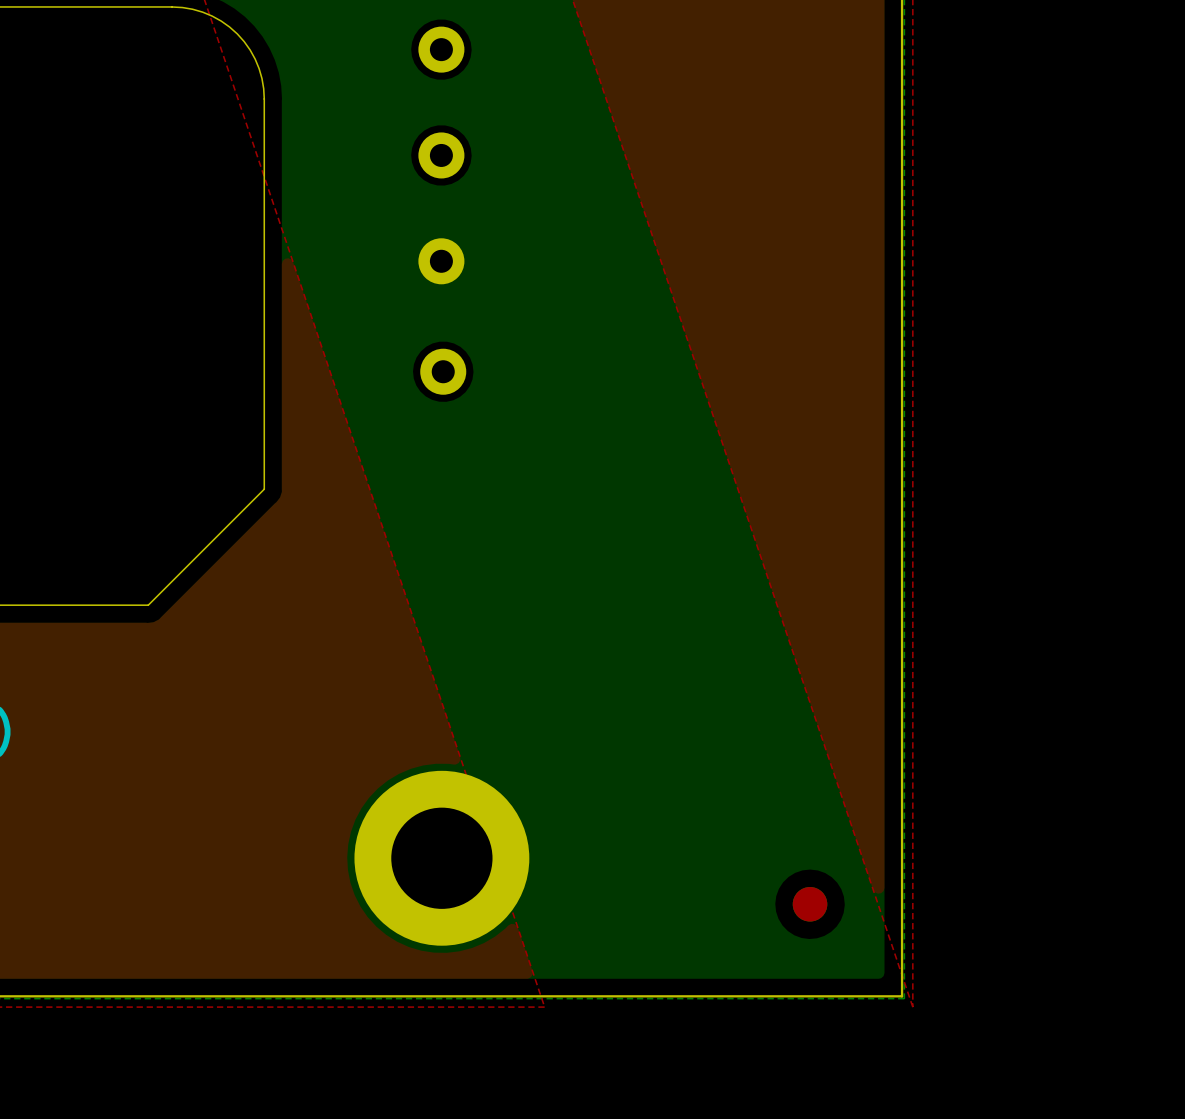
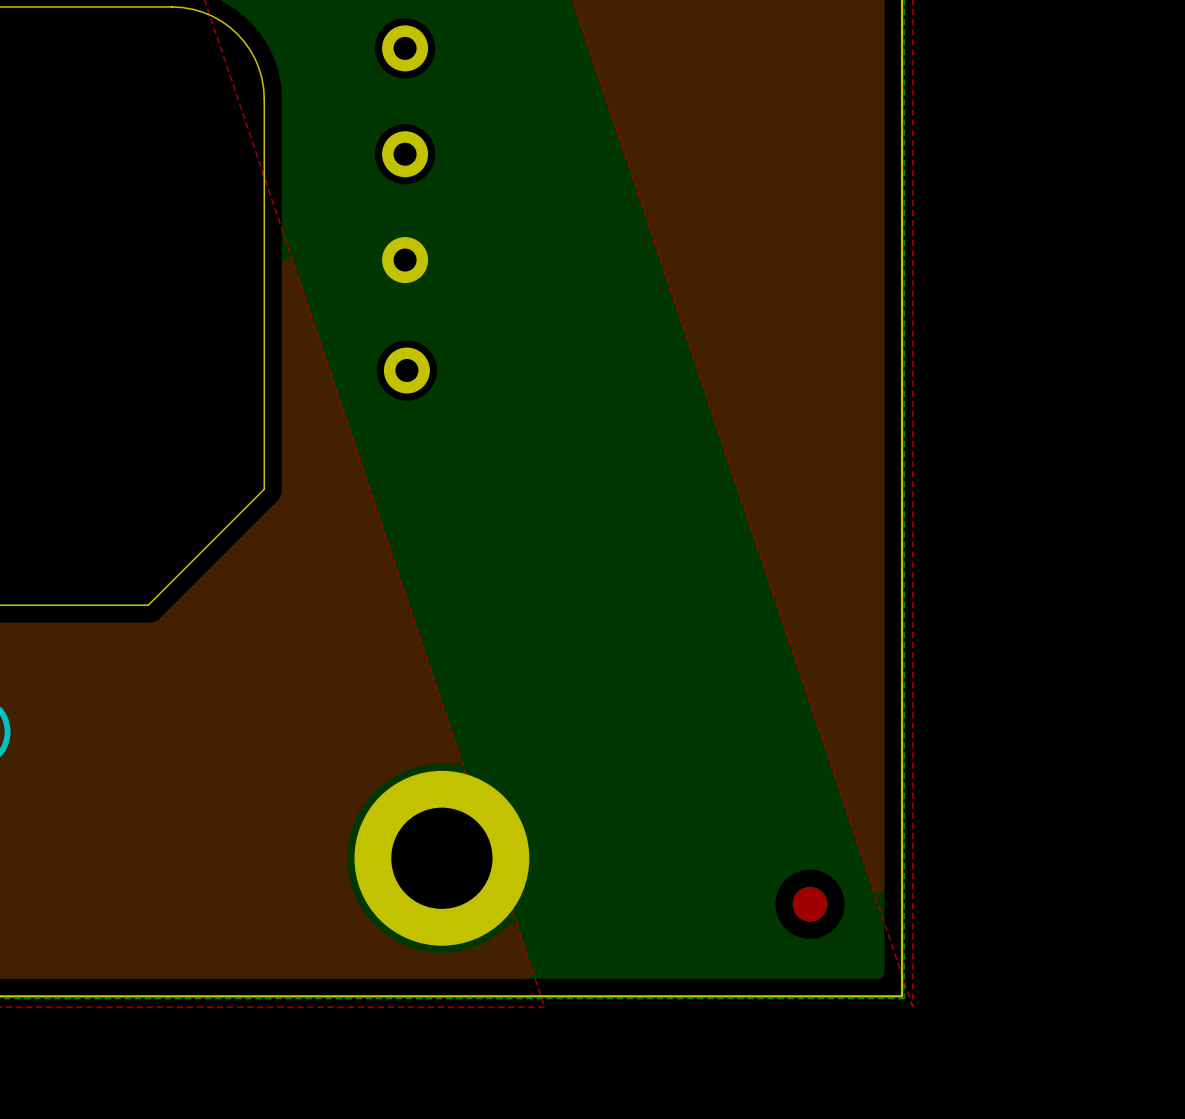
part position: (441, 49) -> (405, 48)
part position: (441, 155) -> (405, 154)
part position: (441, 261) -> (405, 260)
part position: (443, 371) -> (406, 370)

